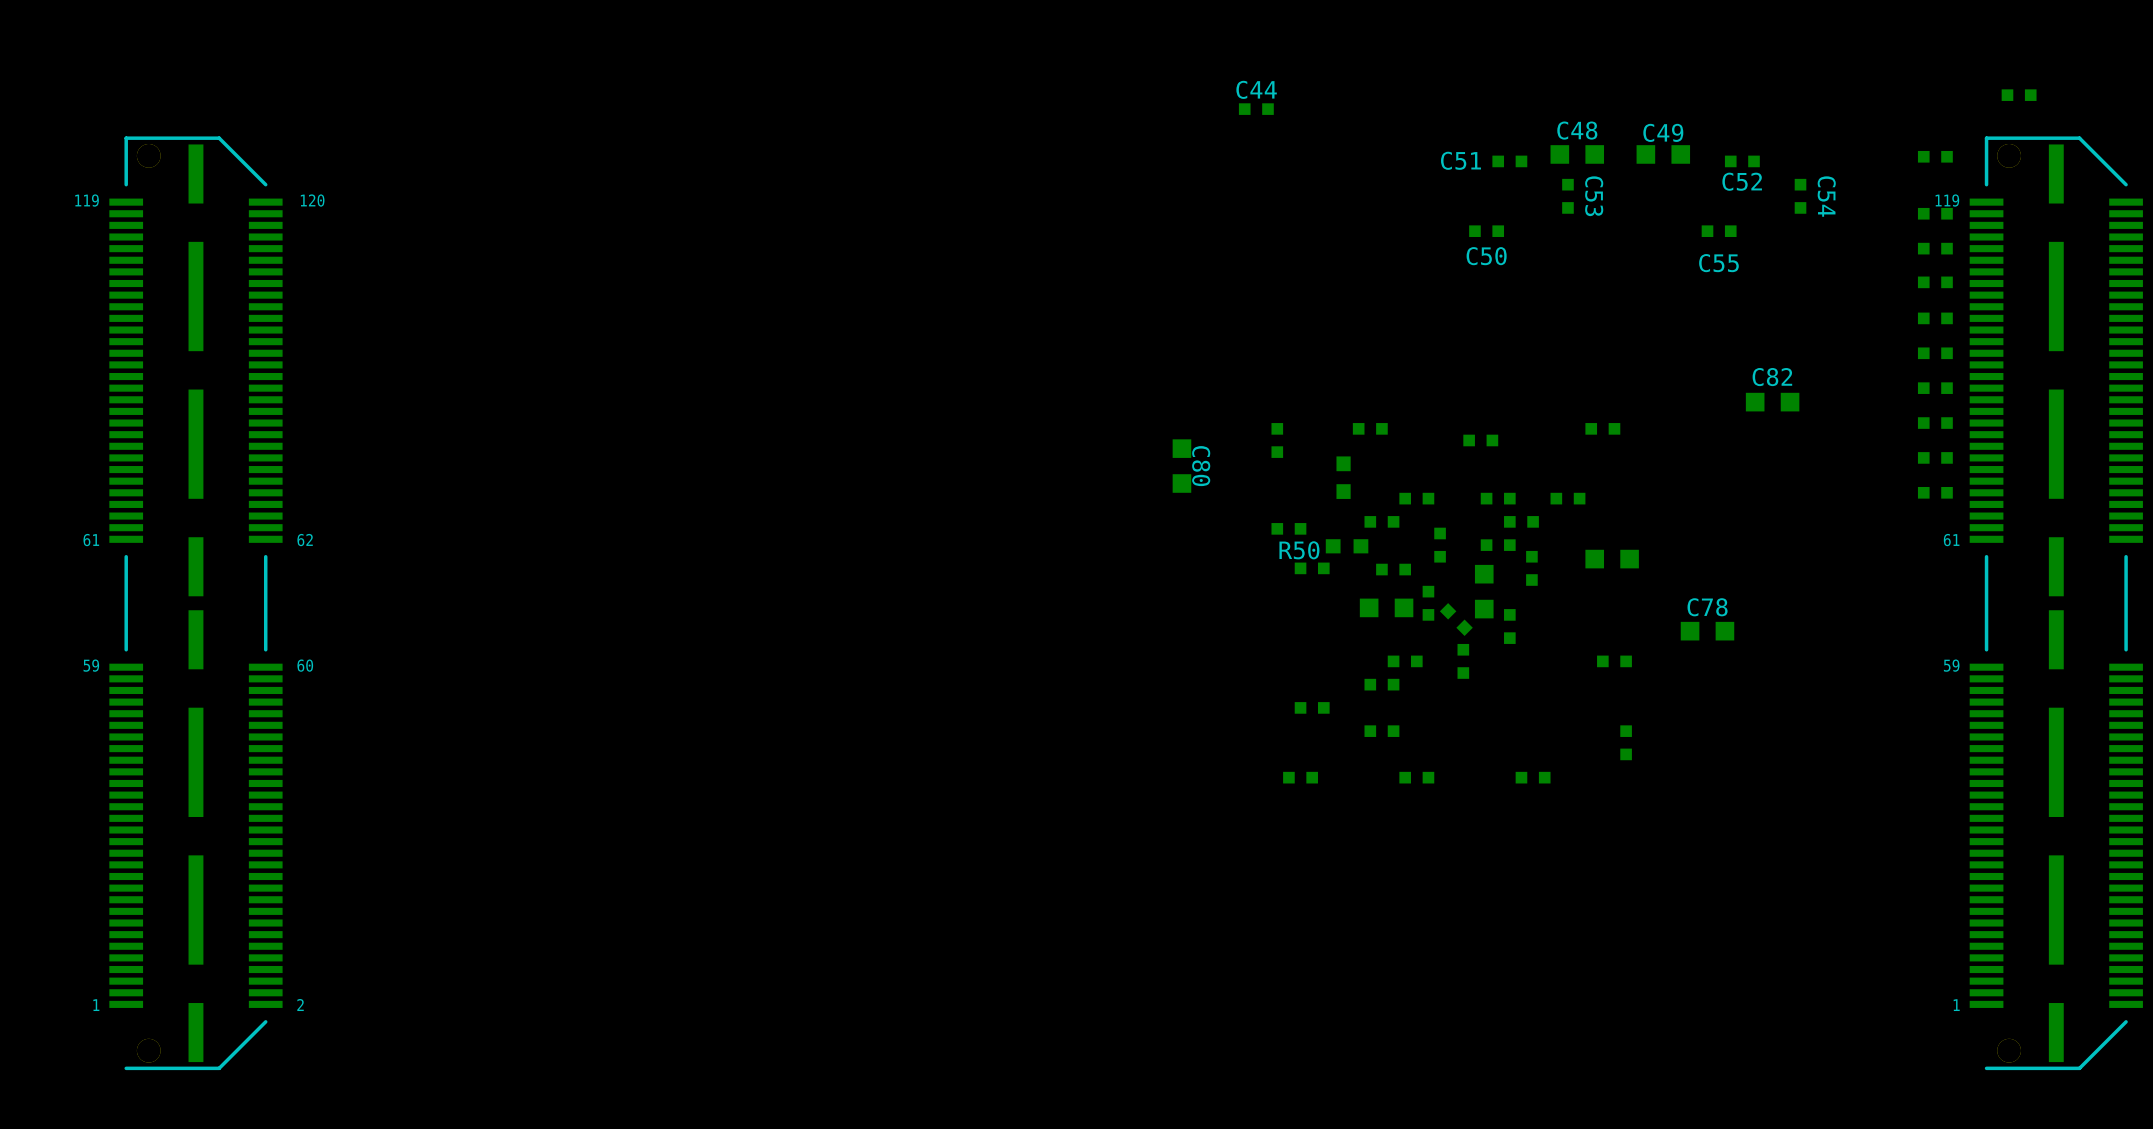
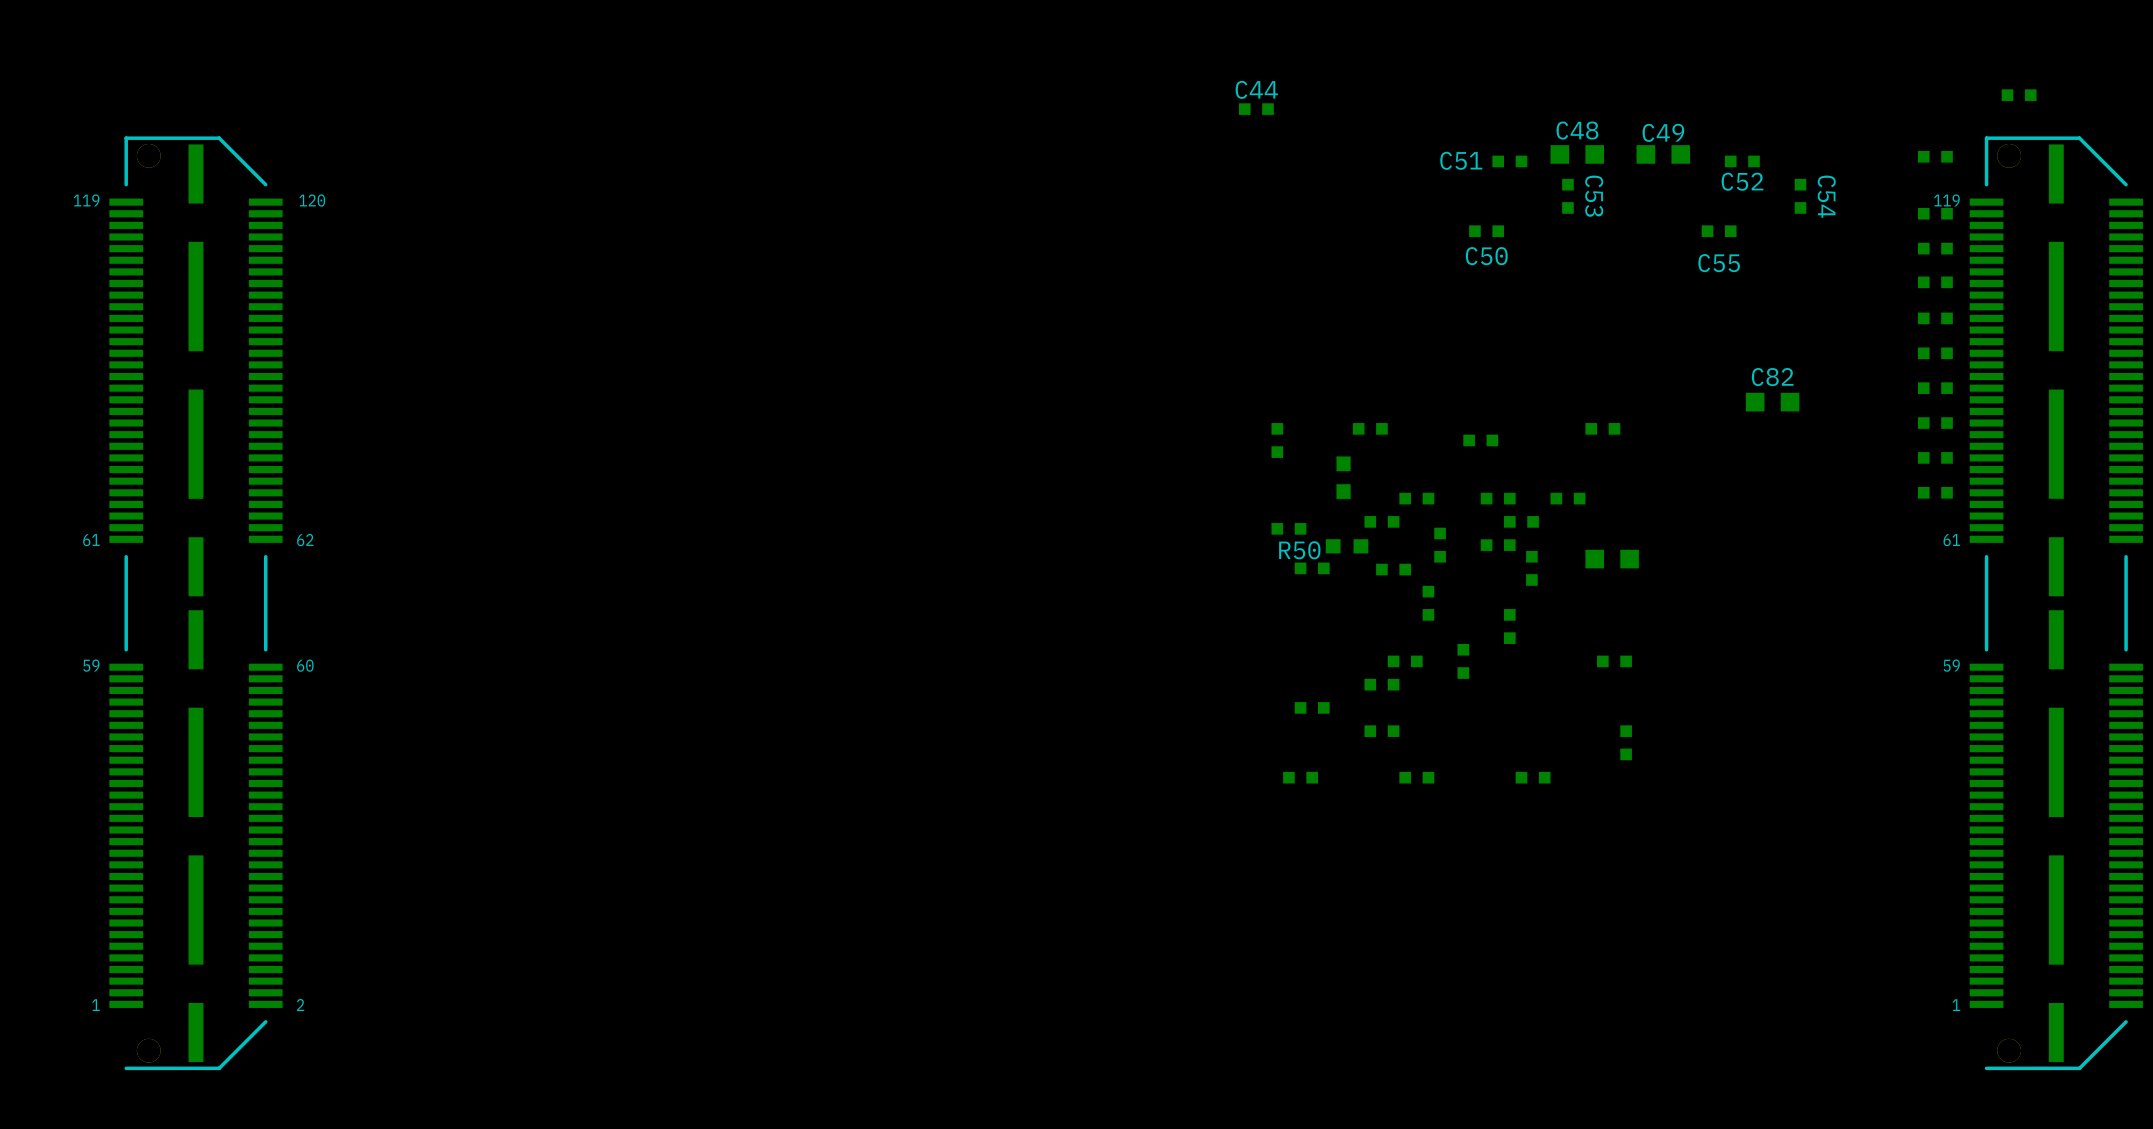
C80: (1181, 466) -> none
part: (1484, 591) -> none
part: (1386, 607) -> none
part: (1456, 619) -> none
C78: (1707, 631) -> none

